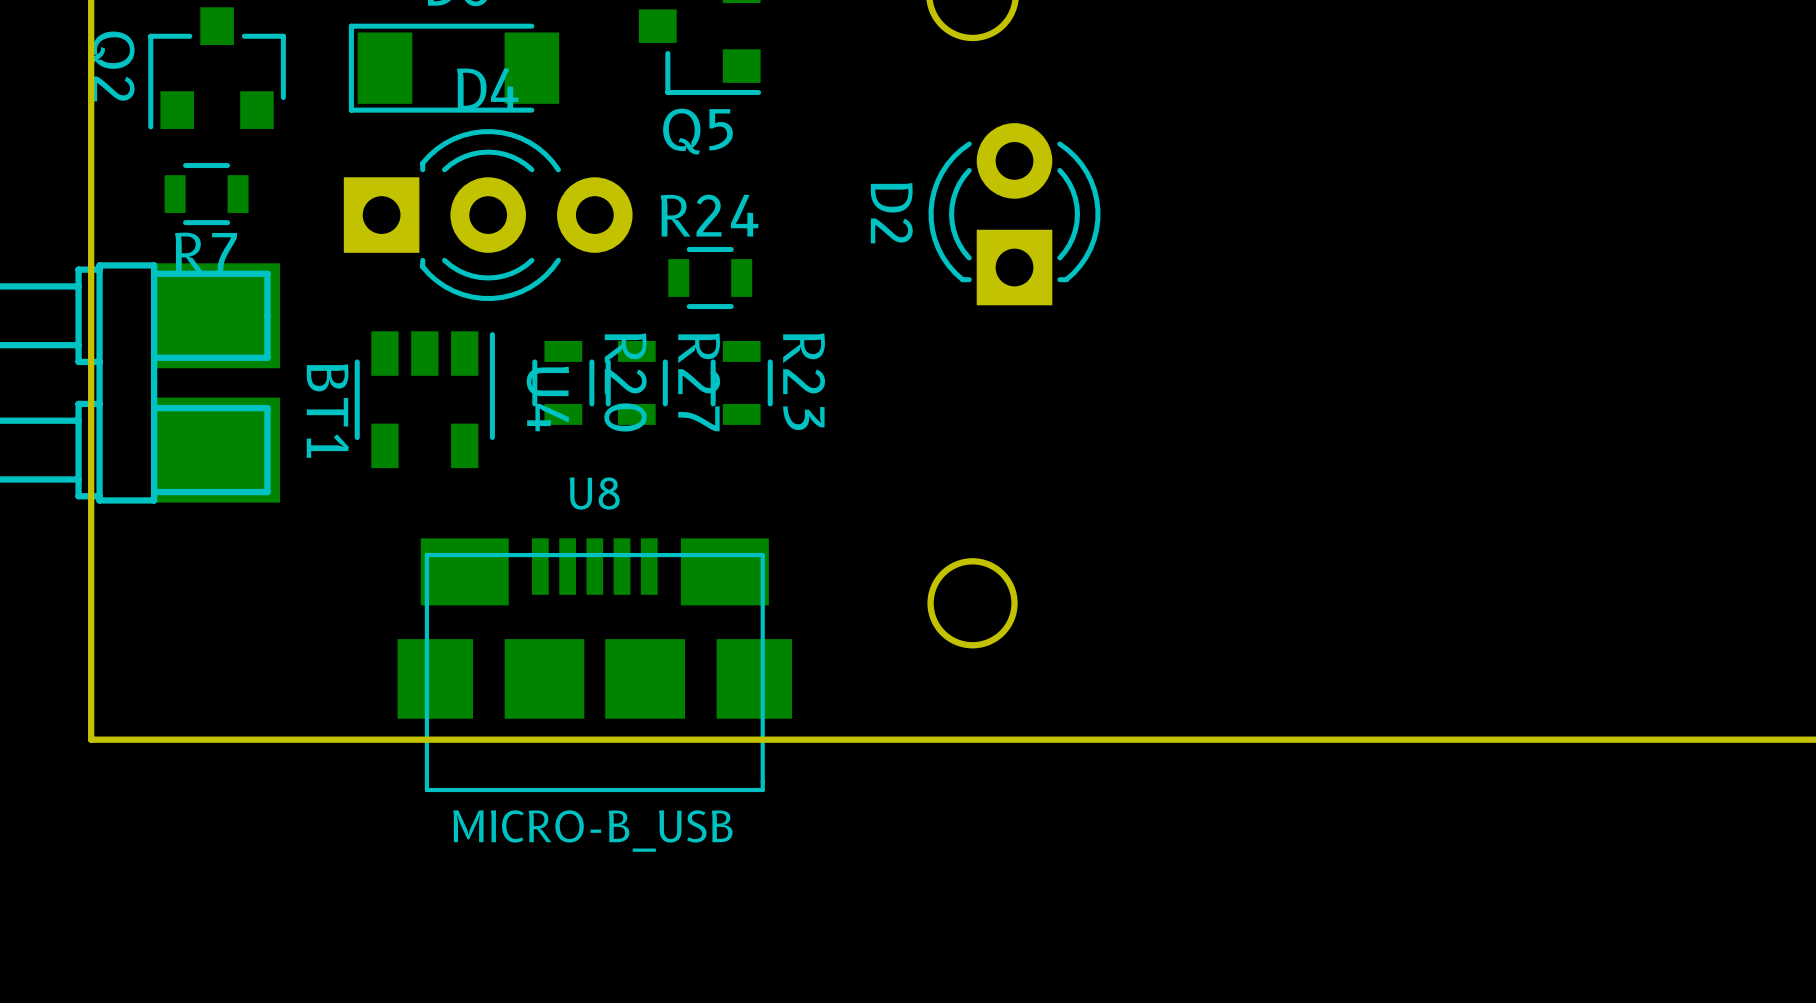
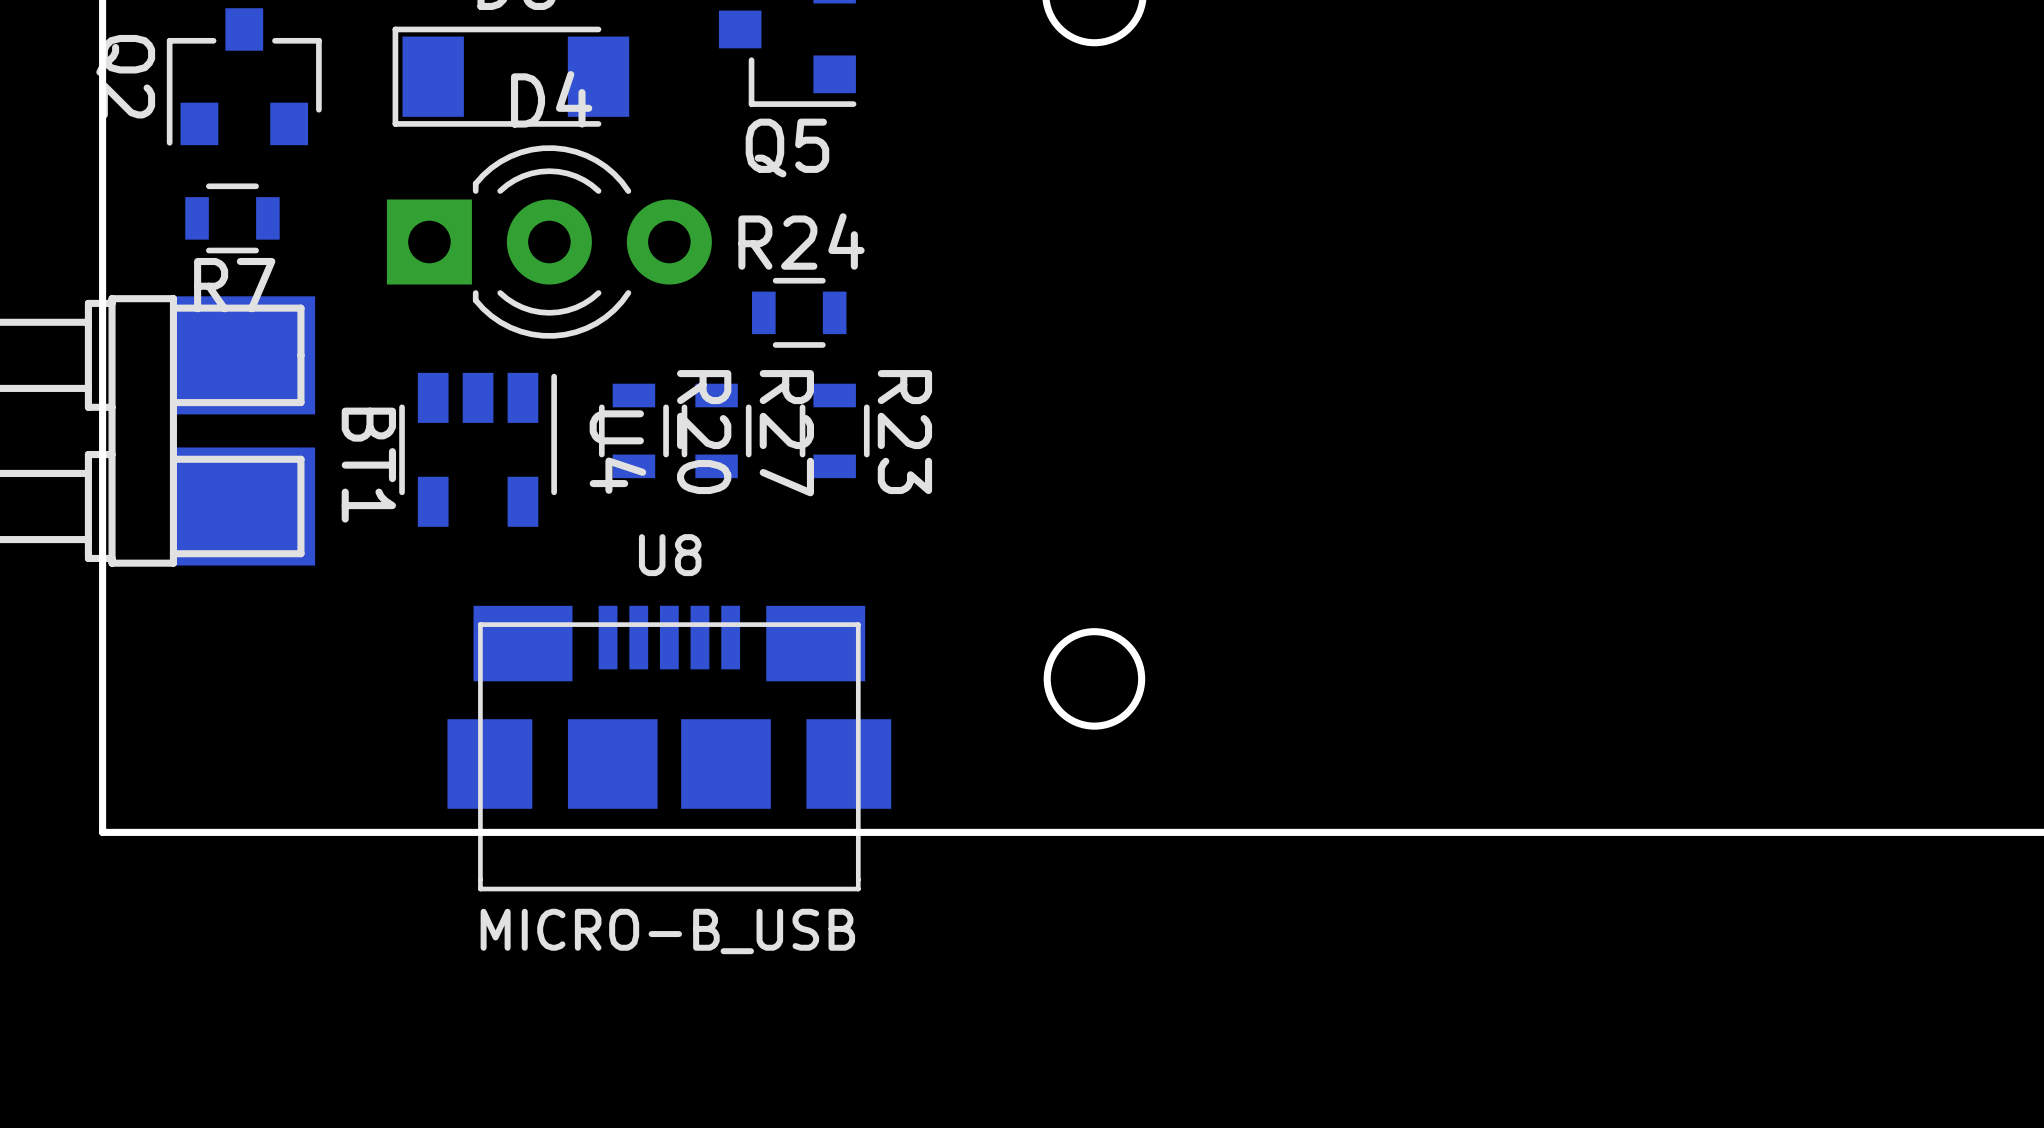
D2: (1014, 214) -> none

